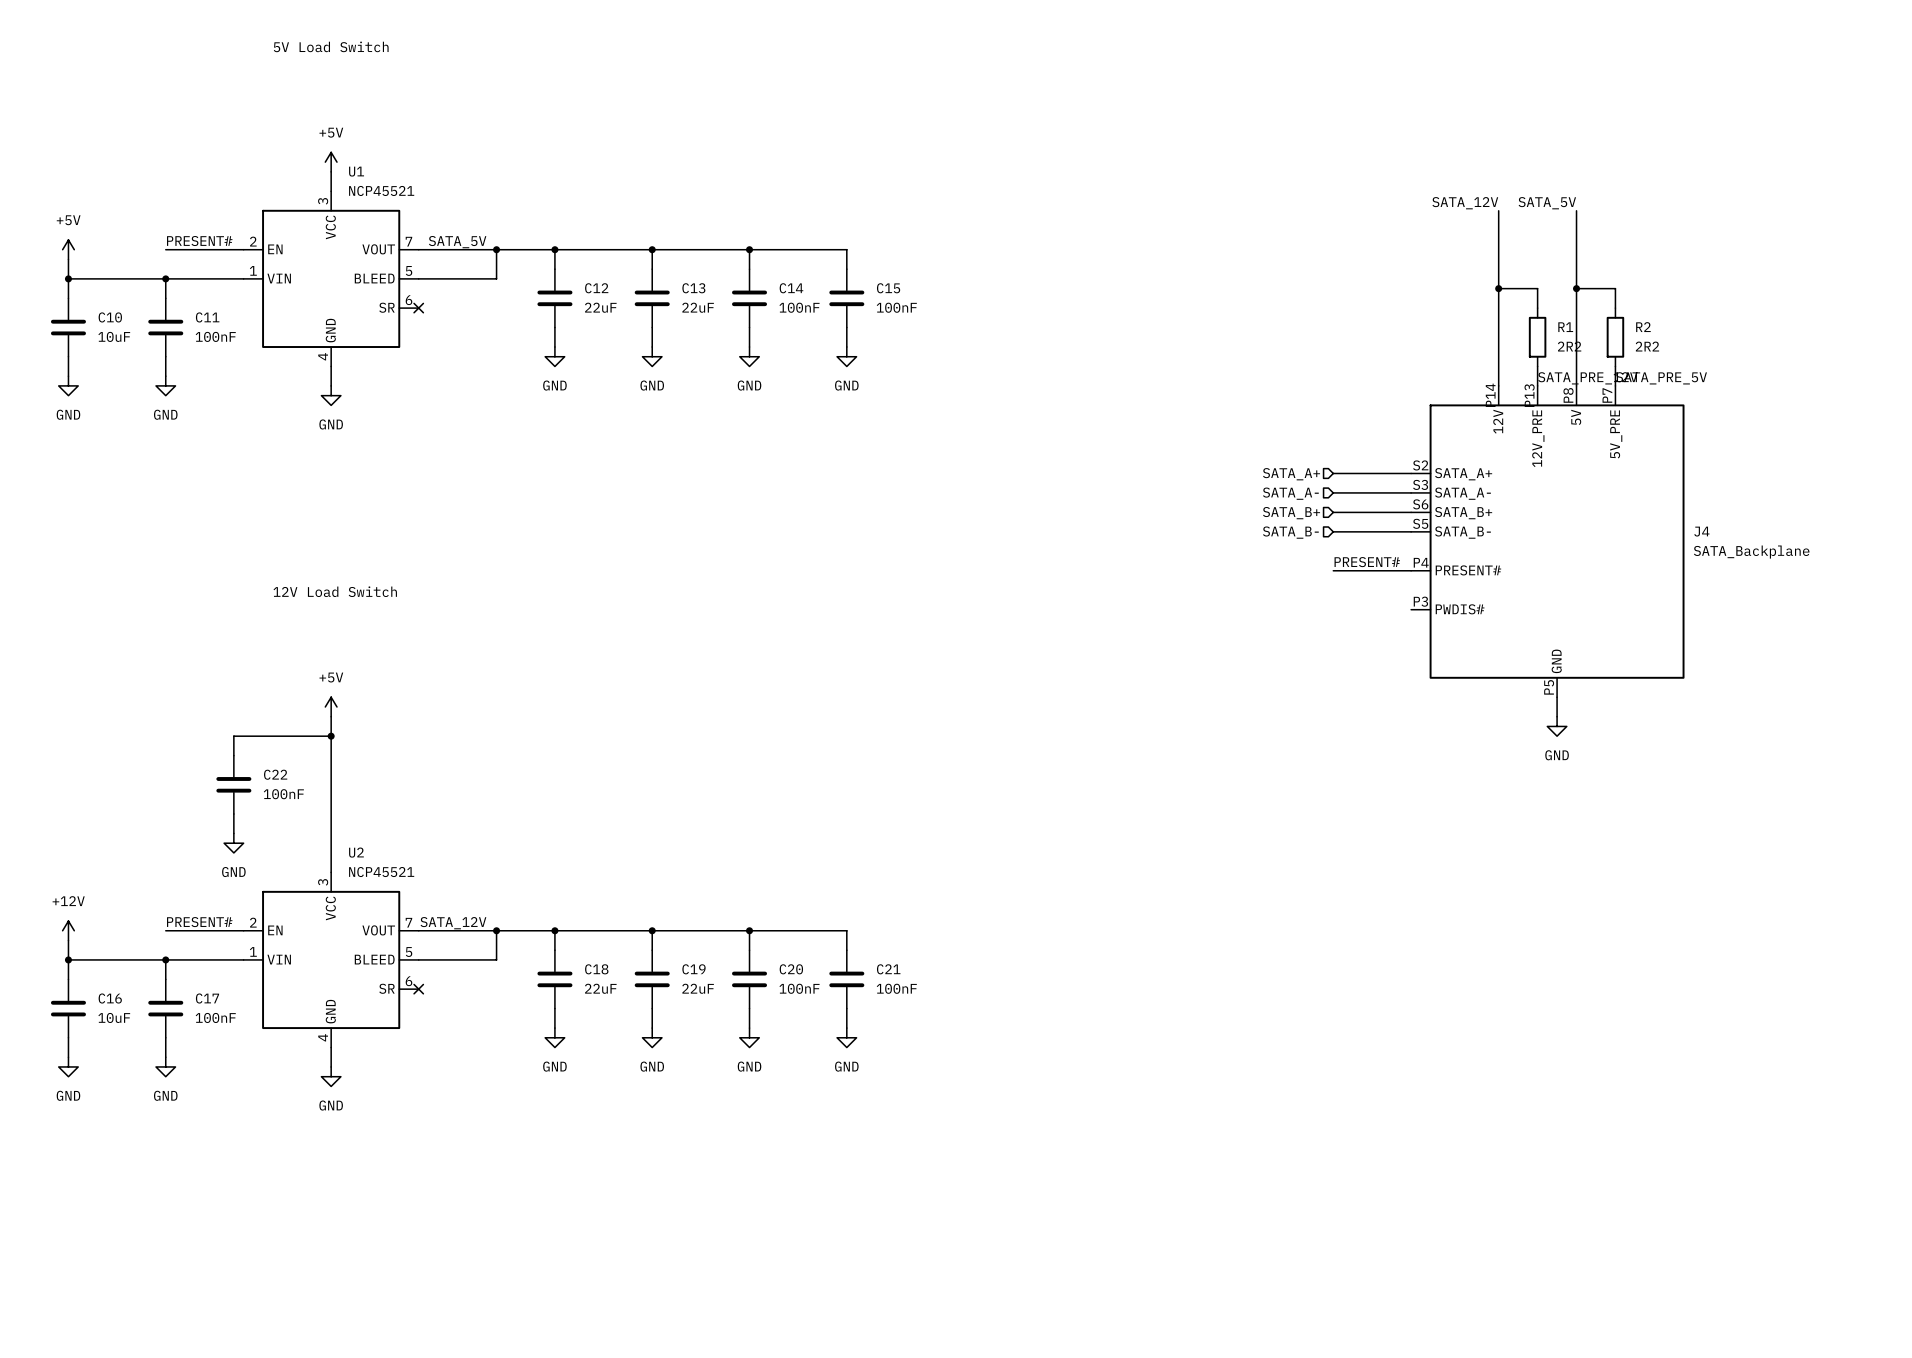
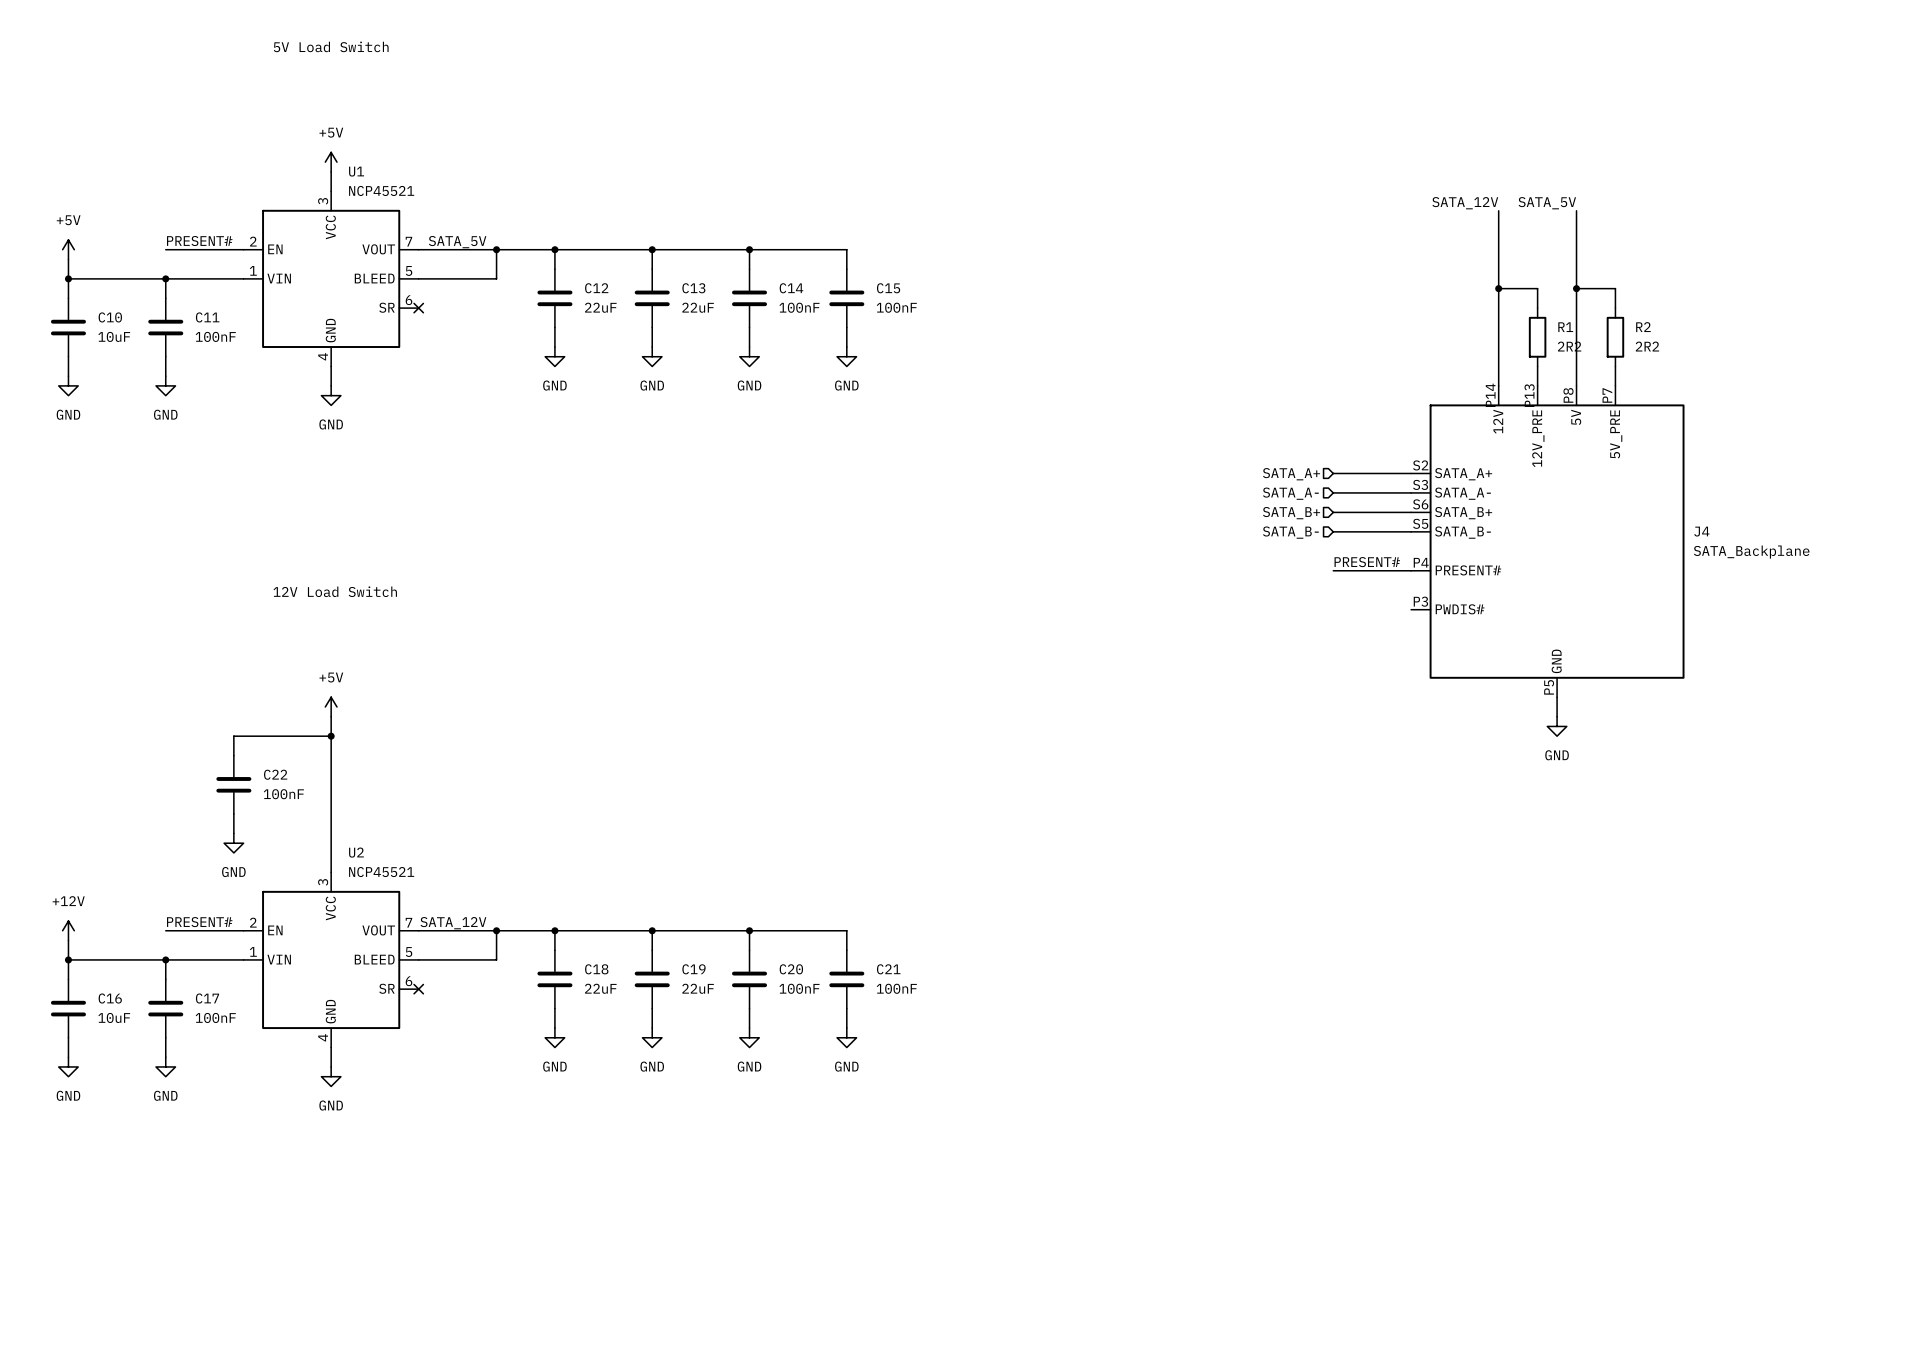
label: SATA_PRE_12V (1587, 378) -> none
label: SATA_PRE_5V (1661, 378) -> none

